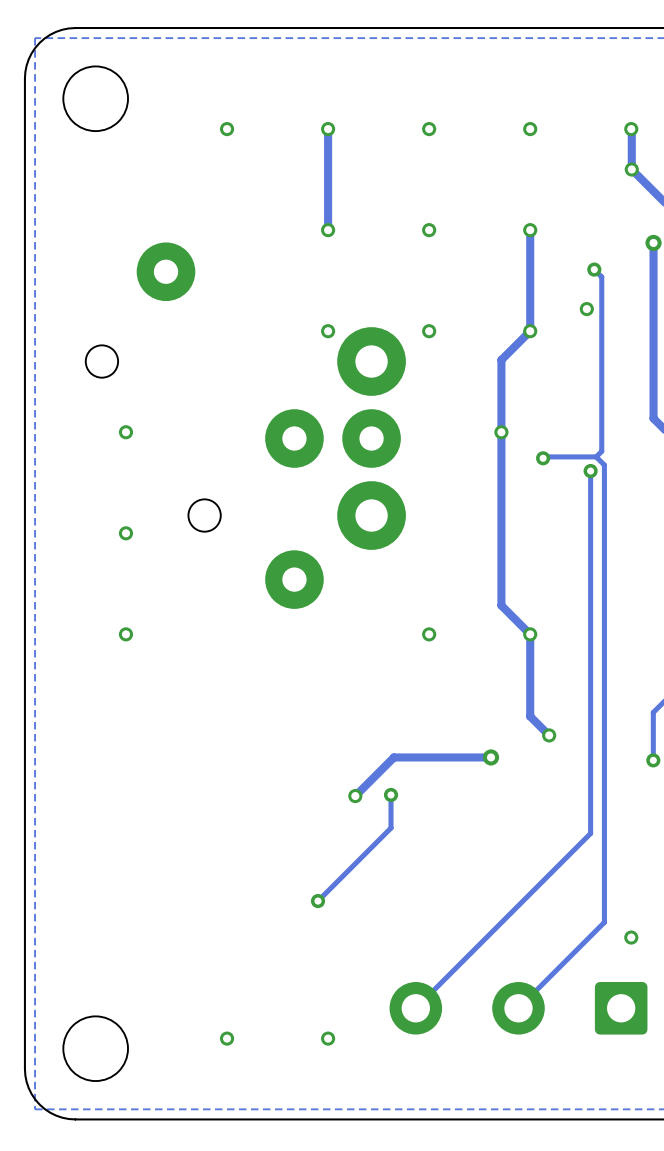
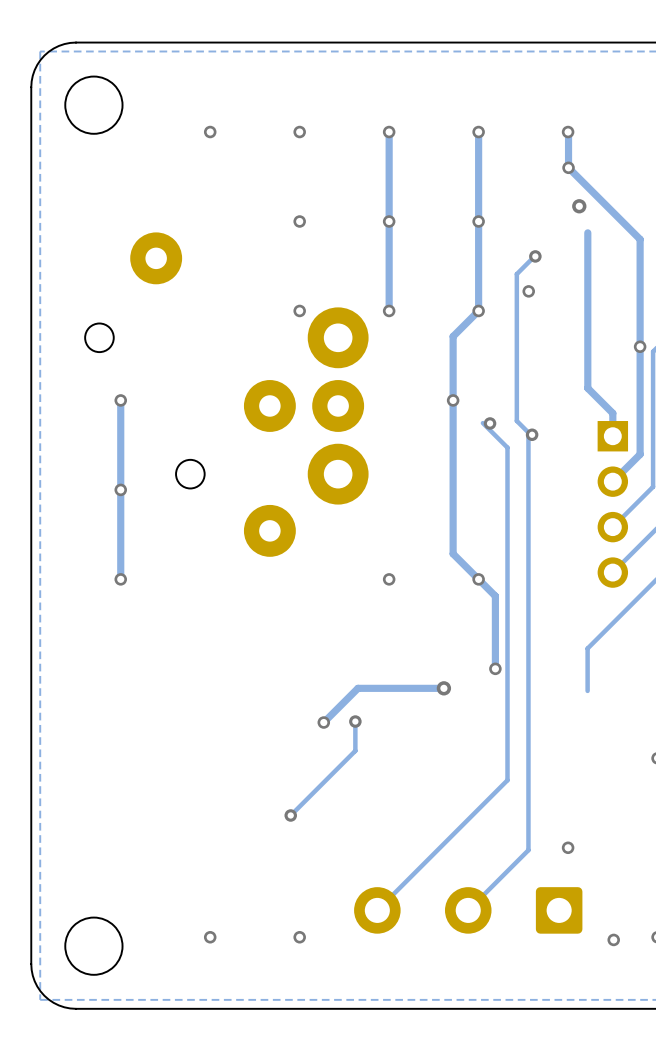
track: (328, 129) (328, 230) -> (478, 132) (478, 221)
track: none -> (389, 132) (389, 310)
via position: (653, 242) -> (579, 206)
track: (594, 269) (601, 277) (601, 451) (596, 456) -> none
track: none -> (120, 400) (120, 579)
track: (596, 456) (604, 465) (604, 922) (586, 940) -> (534, 256) (516, 274) (516, 420) (528, 432) (528, 850)
track: (596, 456) (543, 458) -> none
track: (590, 471) (590, 833) (562, 861) -> (482, 423) (507, 447) (507, 780)
track: (530, 634) (530, 716) (549, 735) -> (478, 579) (495, 596) (495, 668)
via: (653, 760) -> none

